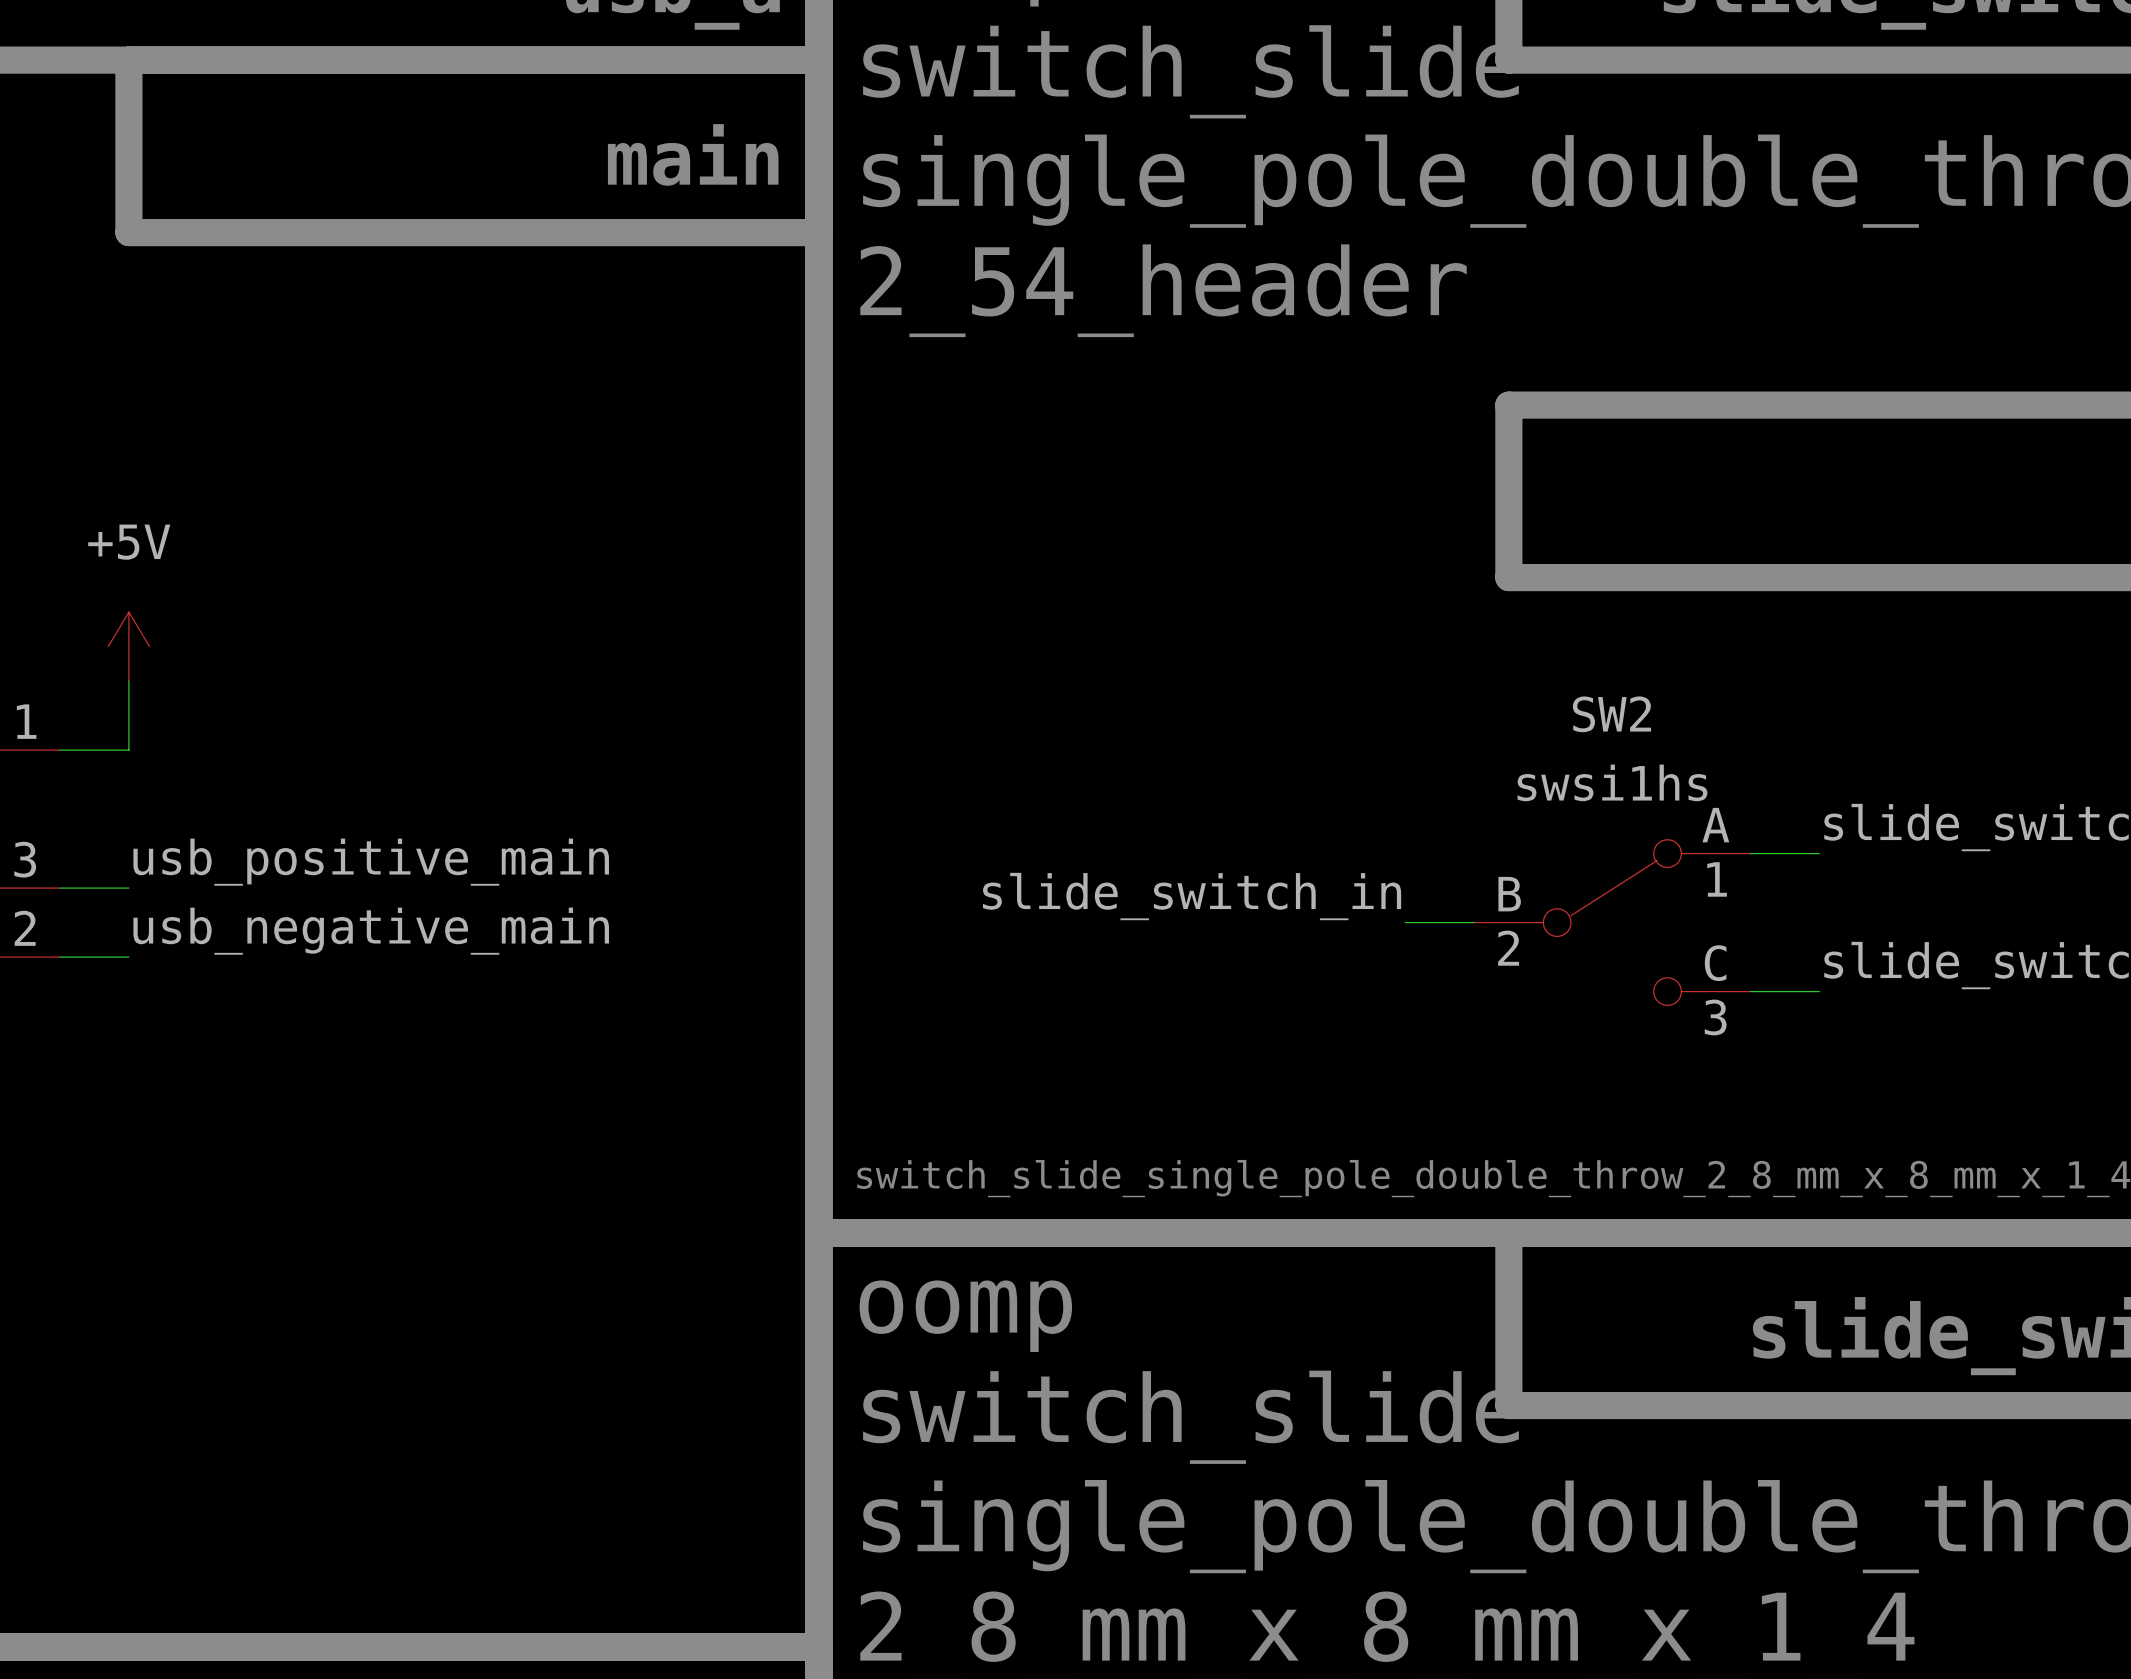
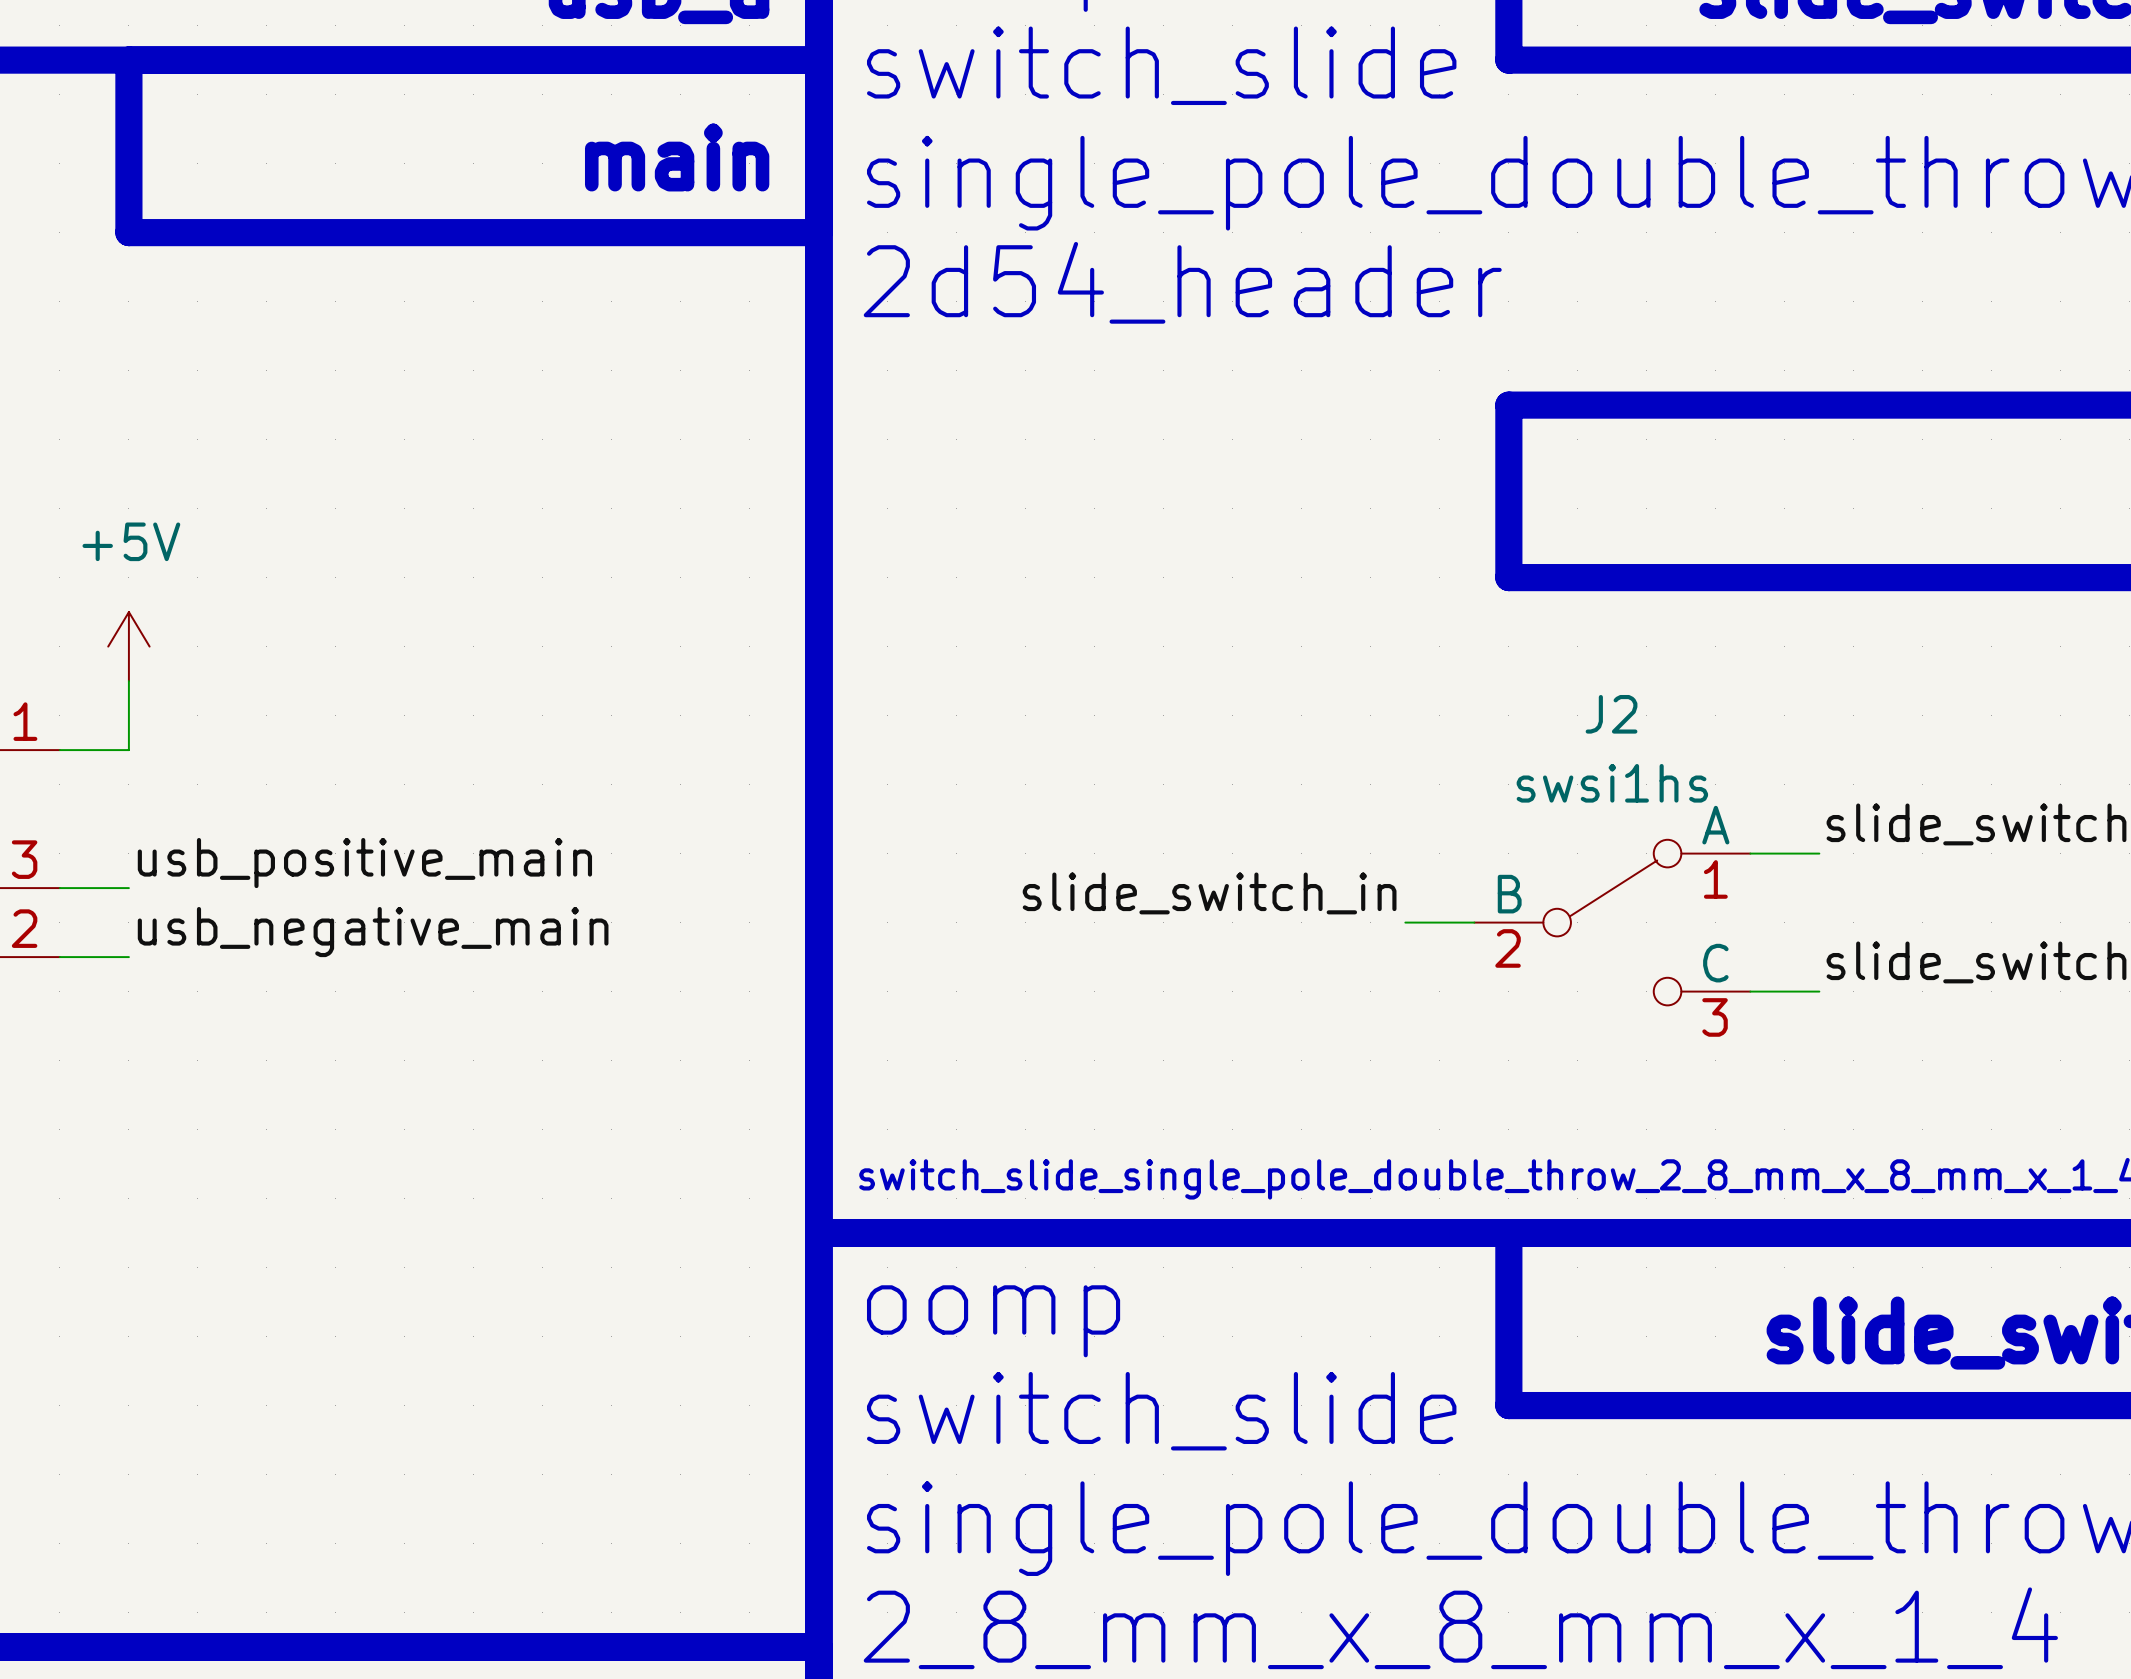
text: 2_54_header (1163, 290) -> 2d54_header (1182, 282)
SW2 name: SW2 (1611, 714) -> J2 (1611, 714)

